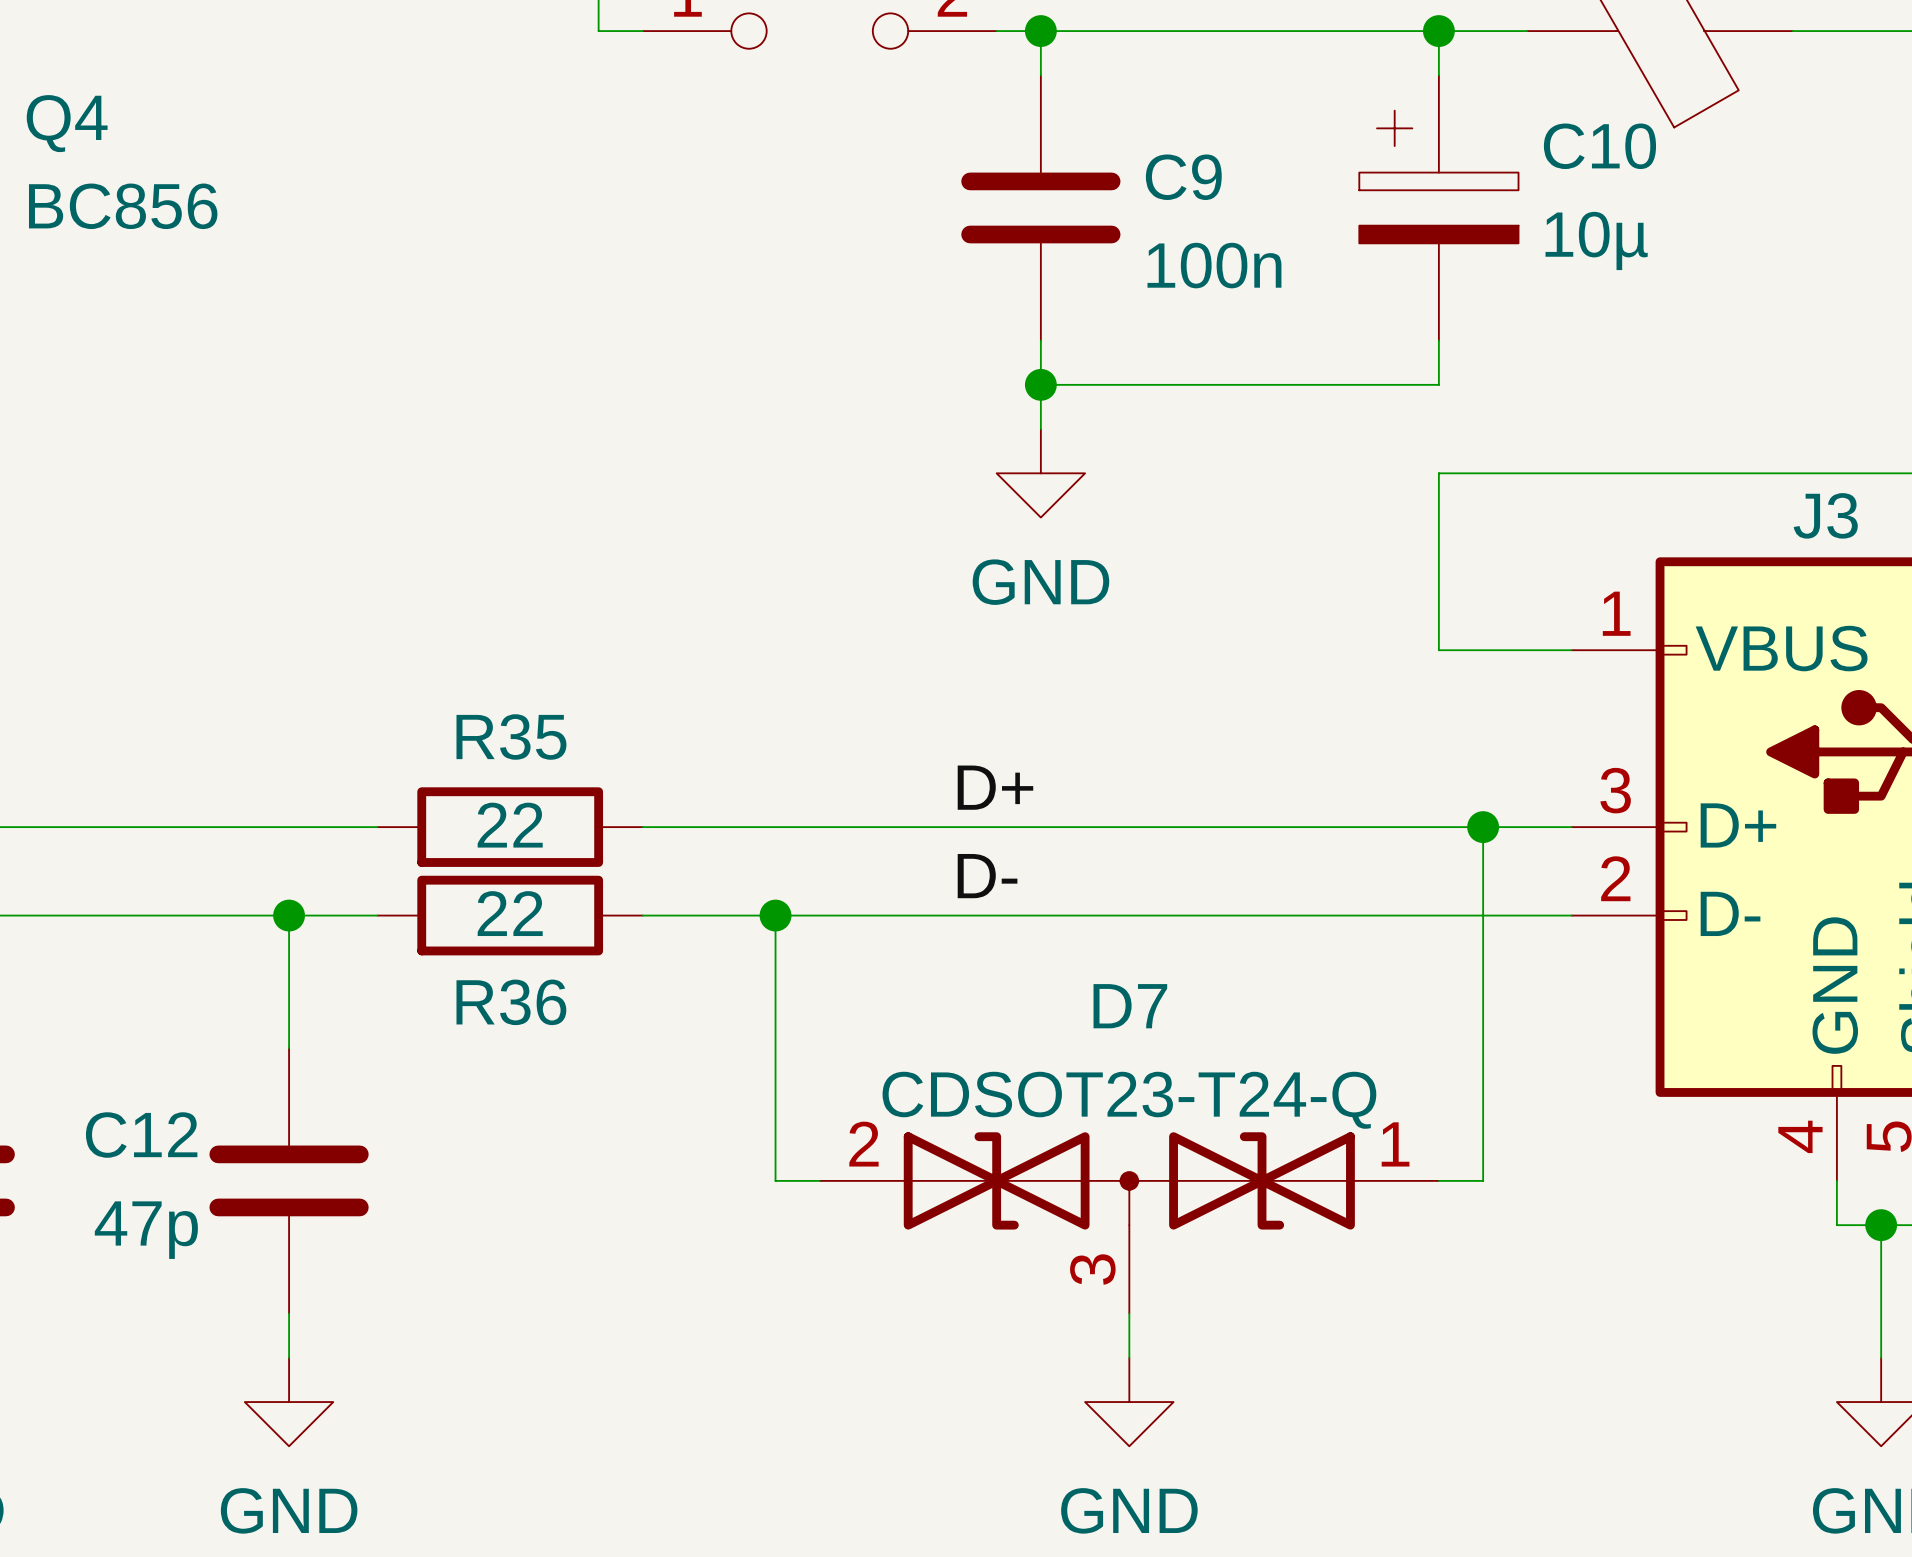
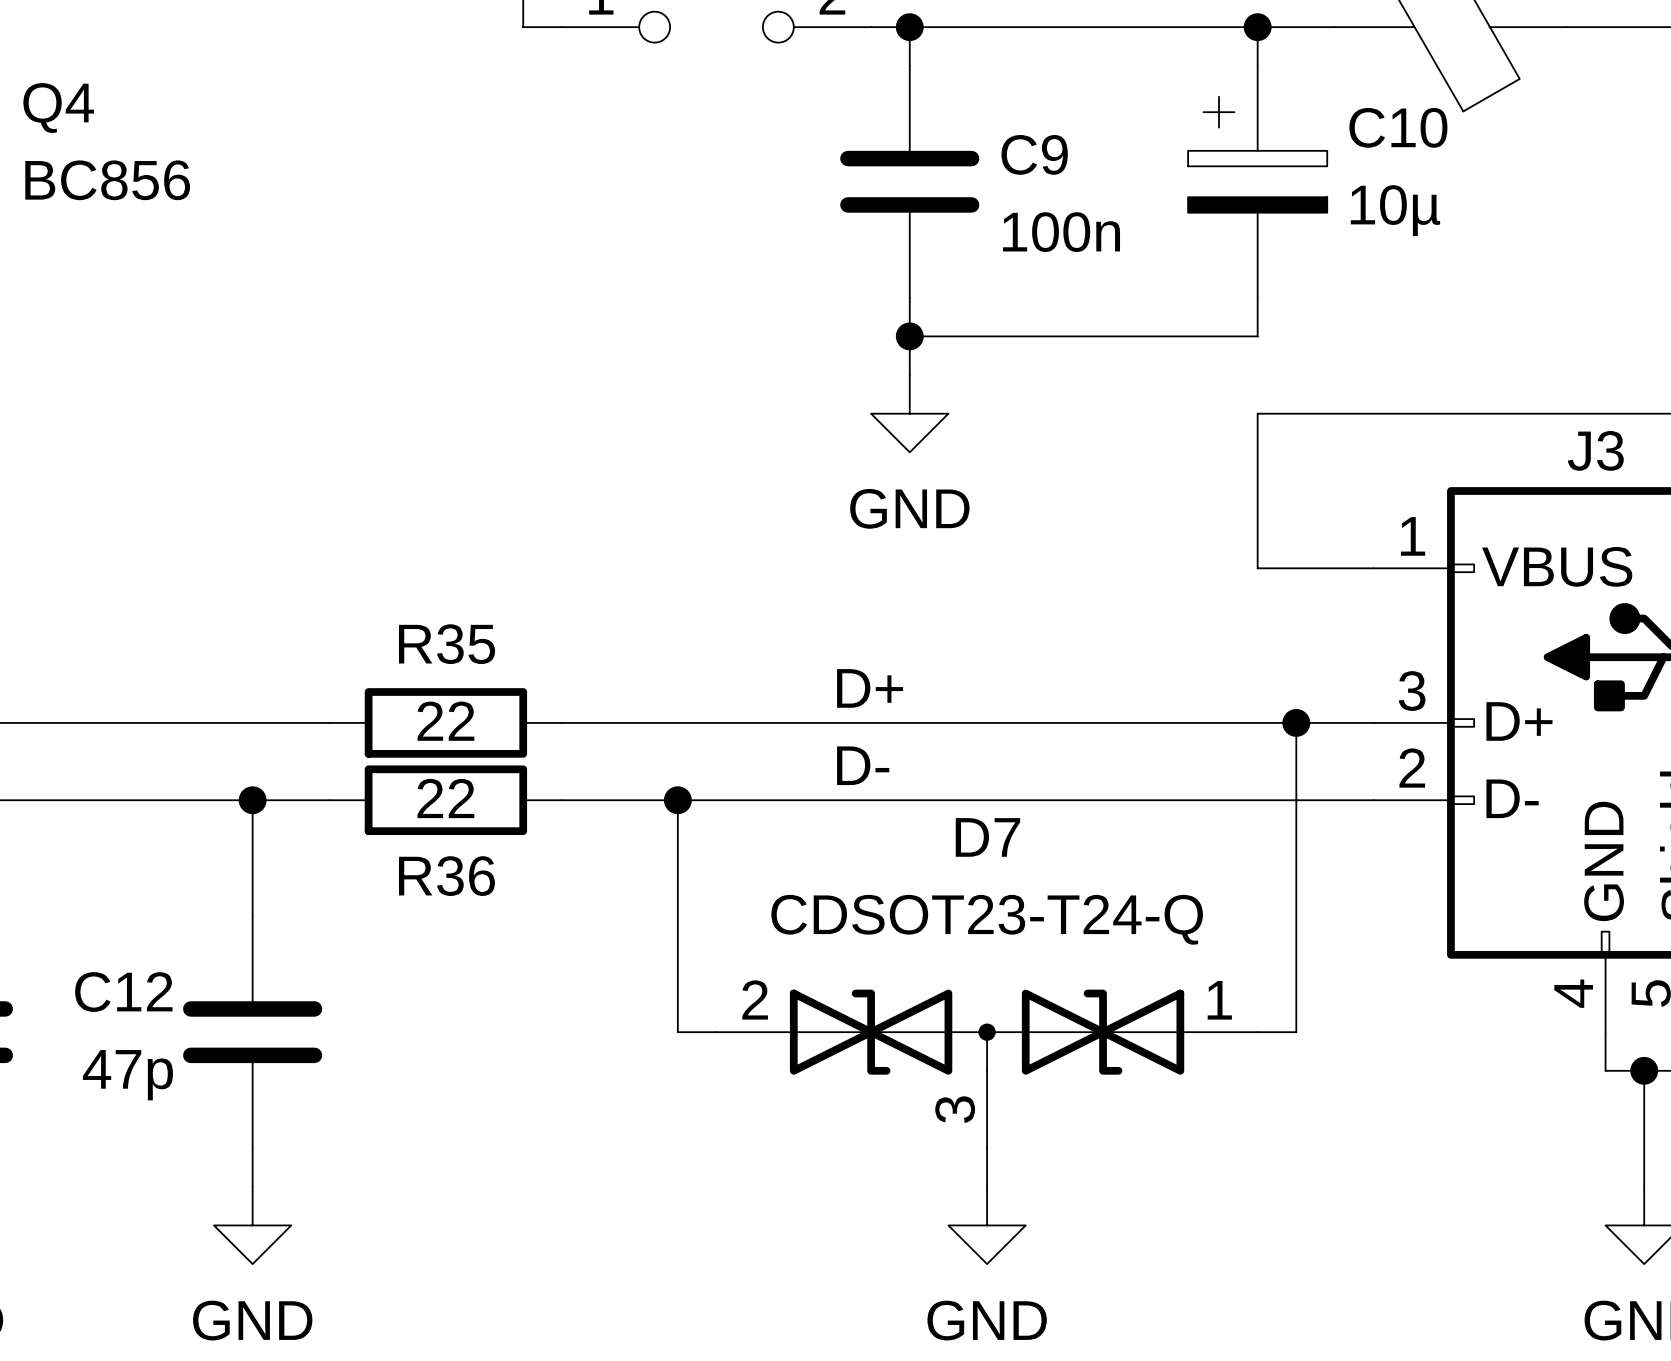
D7 name position: D7 (1130, 1006) -> D7 (987, 837)
D7 value position: CDSOT23-T24-Q (1129, 1100) -> CDSOT23-T24-Q (987, 919)

